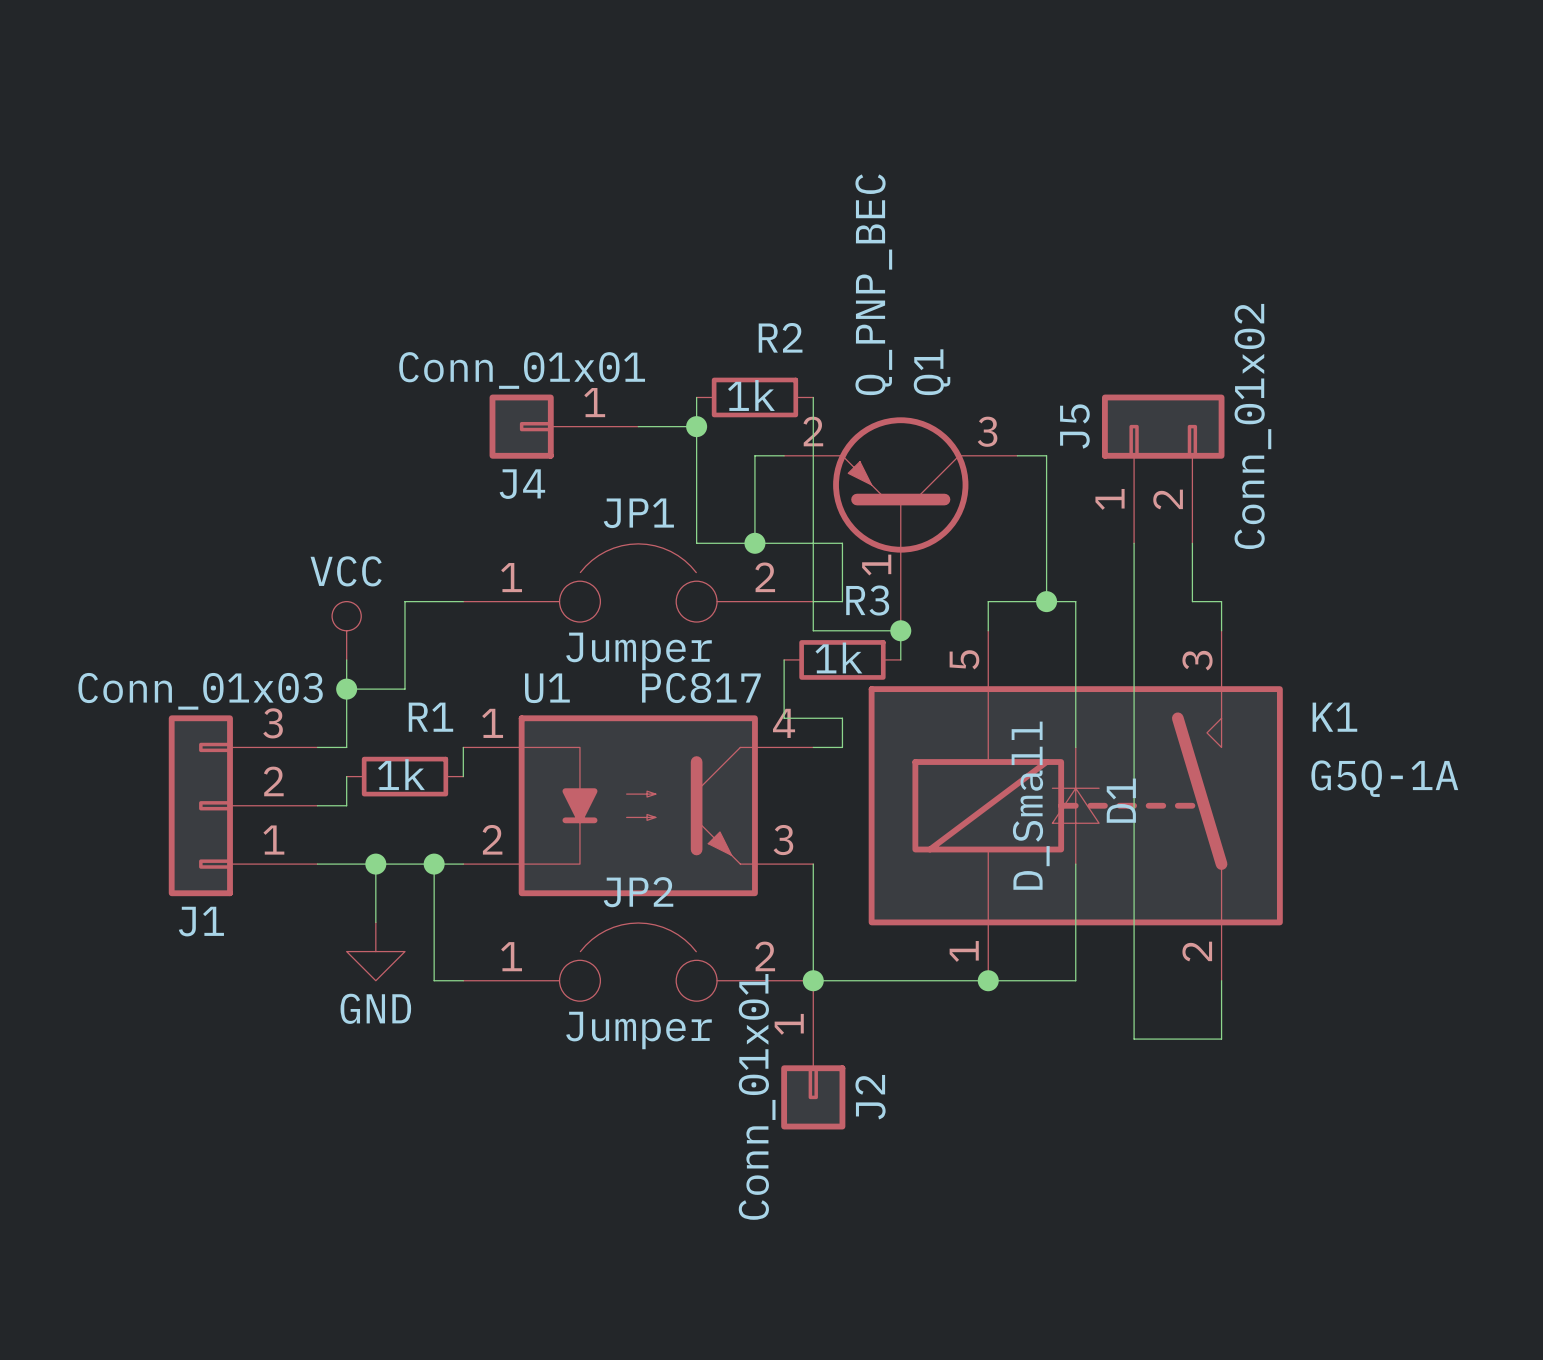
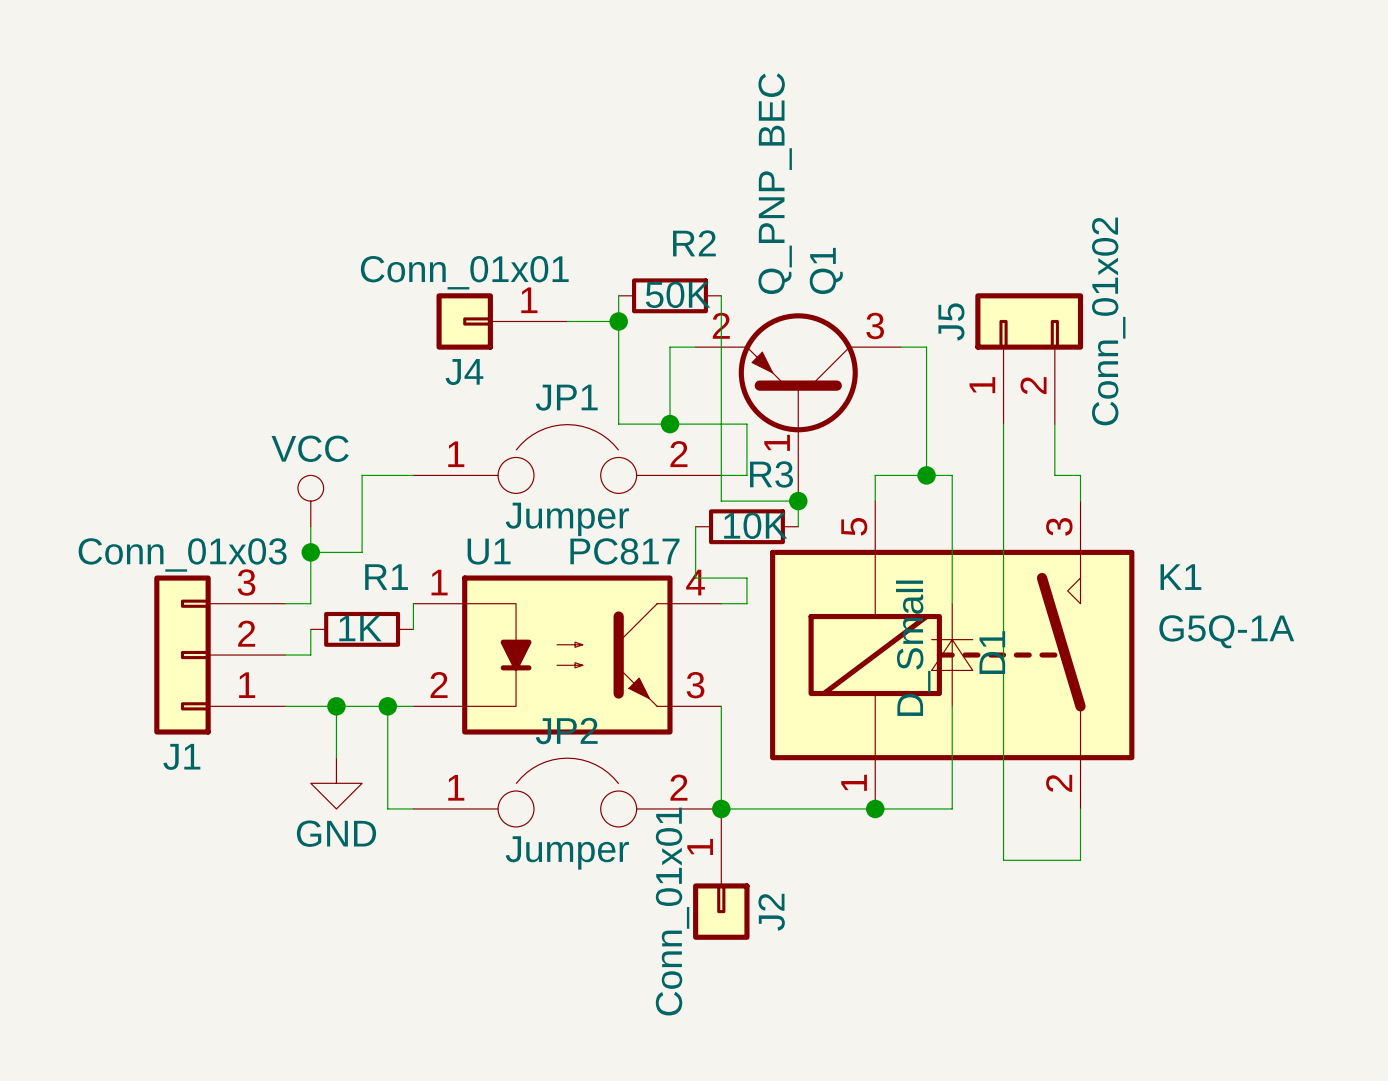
R2 value: 1k (751, 395) -> 50K (678, 294)
R3 value: 1k (838, 657) -> 10K (755, 525)
R1 value: 1k (401, 774) -> 1K (360, 628)

